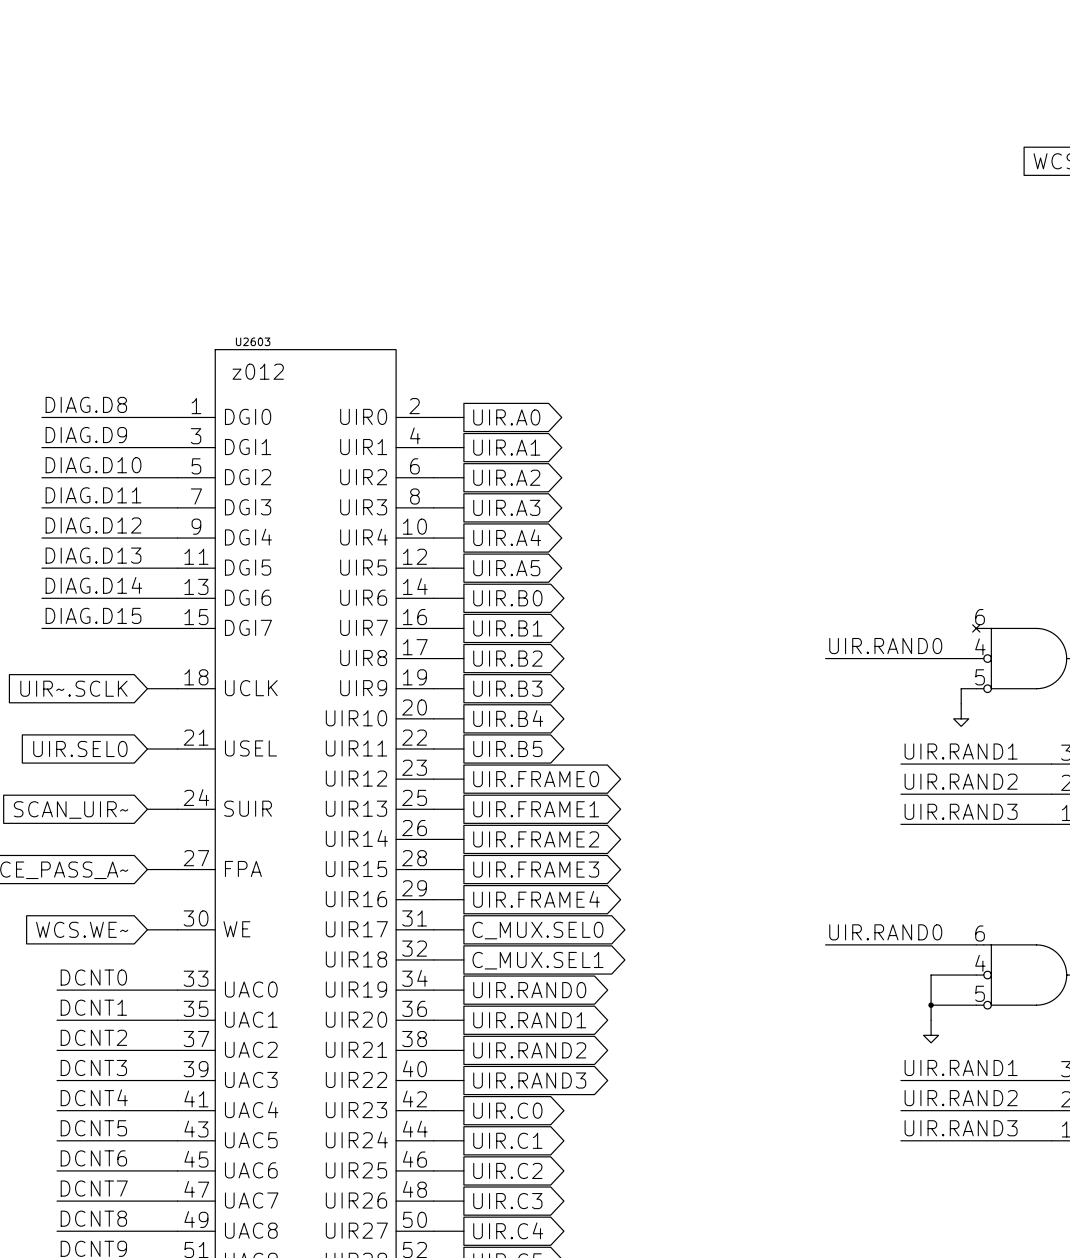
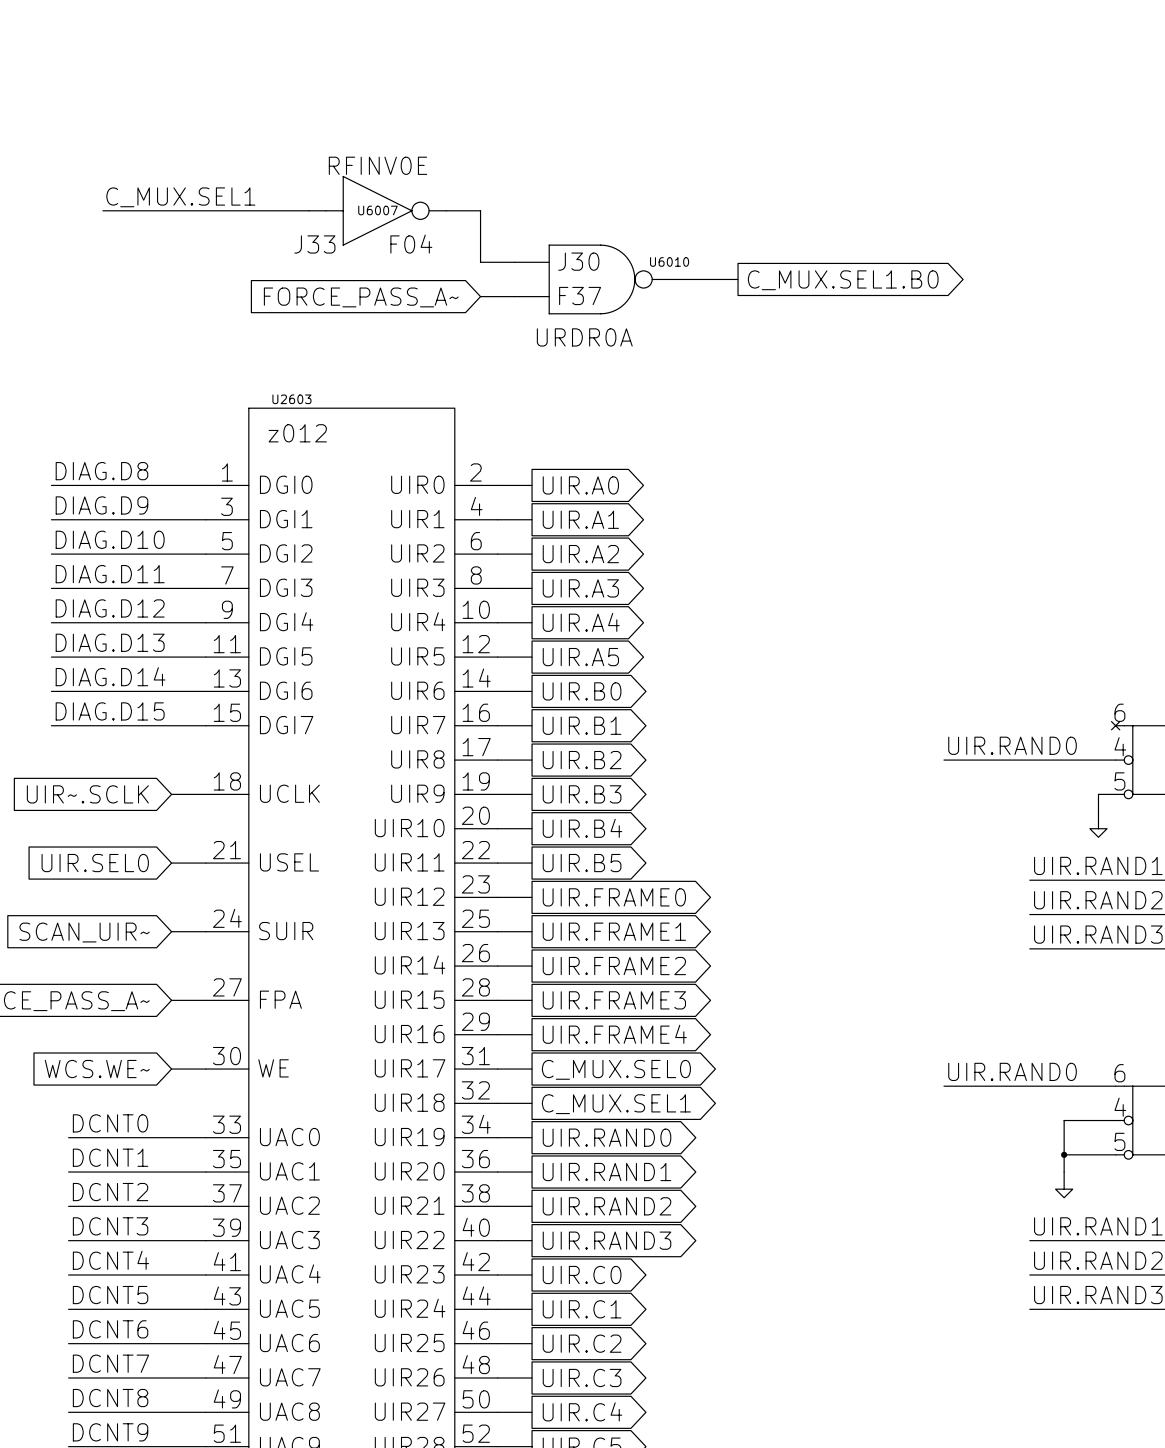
label: none -> C_MUX.SEL1 (180, 197)
wire: none -> (102, 210) (308, 210)
U6007: none -> F04 (377, 210)
wire: none -> (446, 210) (480, 210) (480, 262) (514, 262)
U6010: none -> F37 (592, 279)
wire: none -> (669, 279) (738, 279)
global label: none -> C_MUX.SEL1.B0 (843, 280)
wire: none -> (480, 296) (514, 296)
global label: none -> FORCE_PASS_A~ (361, 297)

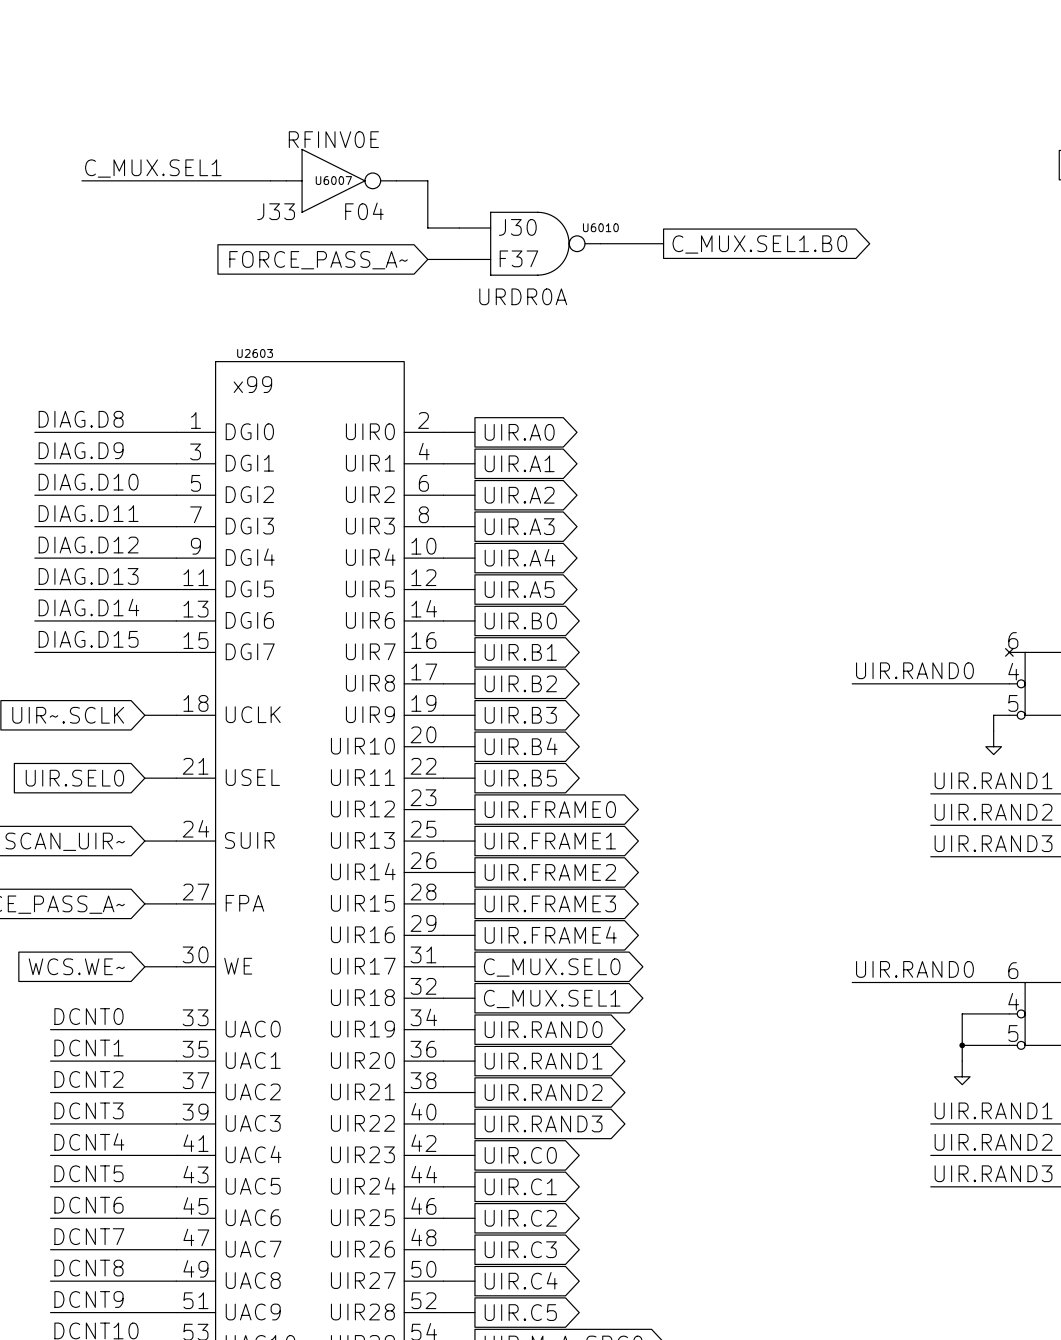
U2603 text: z012 (297, 433) -> x99 (252, 384)

